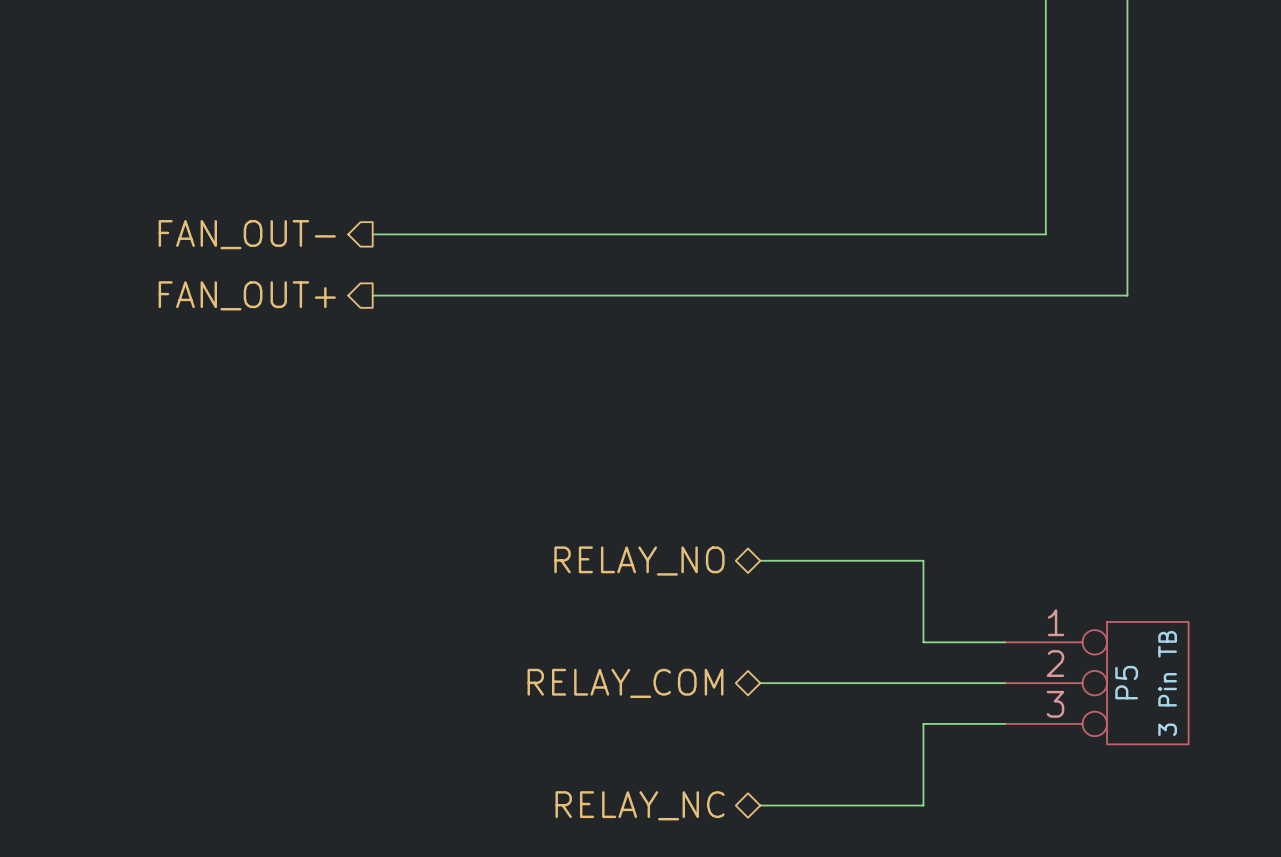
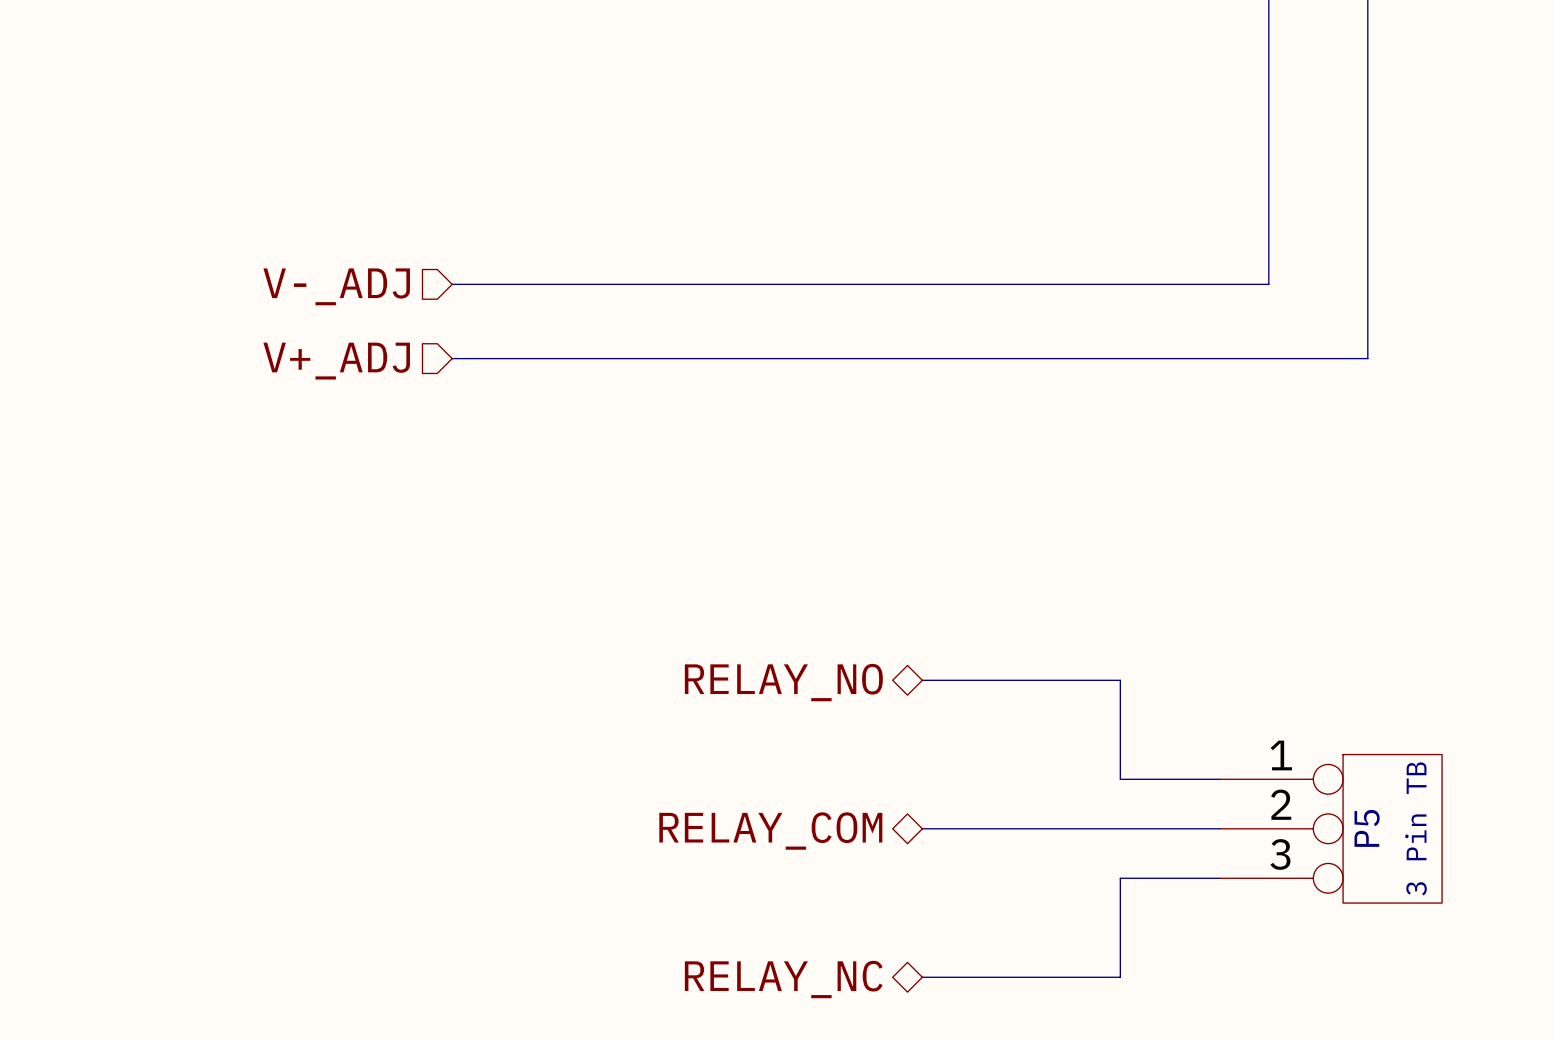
hierarchical label shape: output (247, 234) -> input (336, 286)
hierarchical label: FAN_OUT- (247, 234) -> V-_ADJ (336, 286)
hierarchical label shape: output (247, 295) -> input (336, 361)
hierarchical label: FAN_OUT+ (247, 295) -> V+_ADJ (336, 361)

